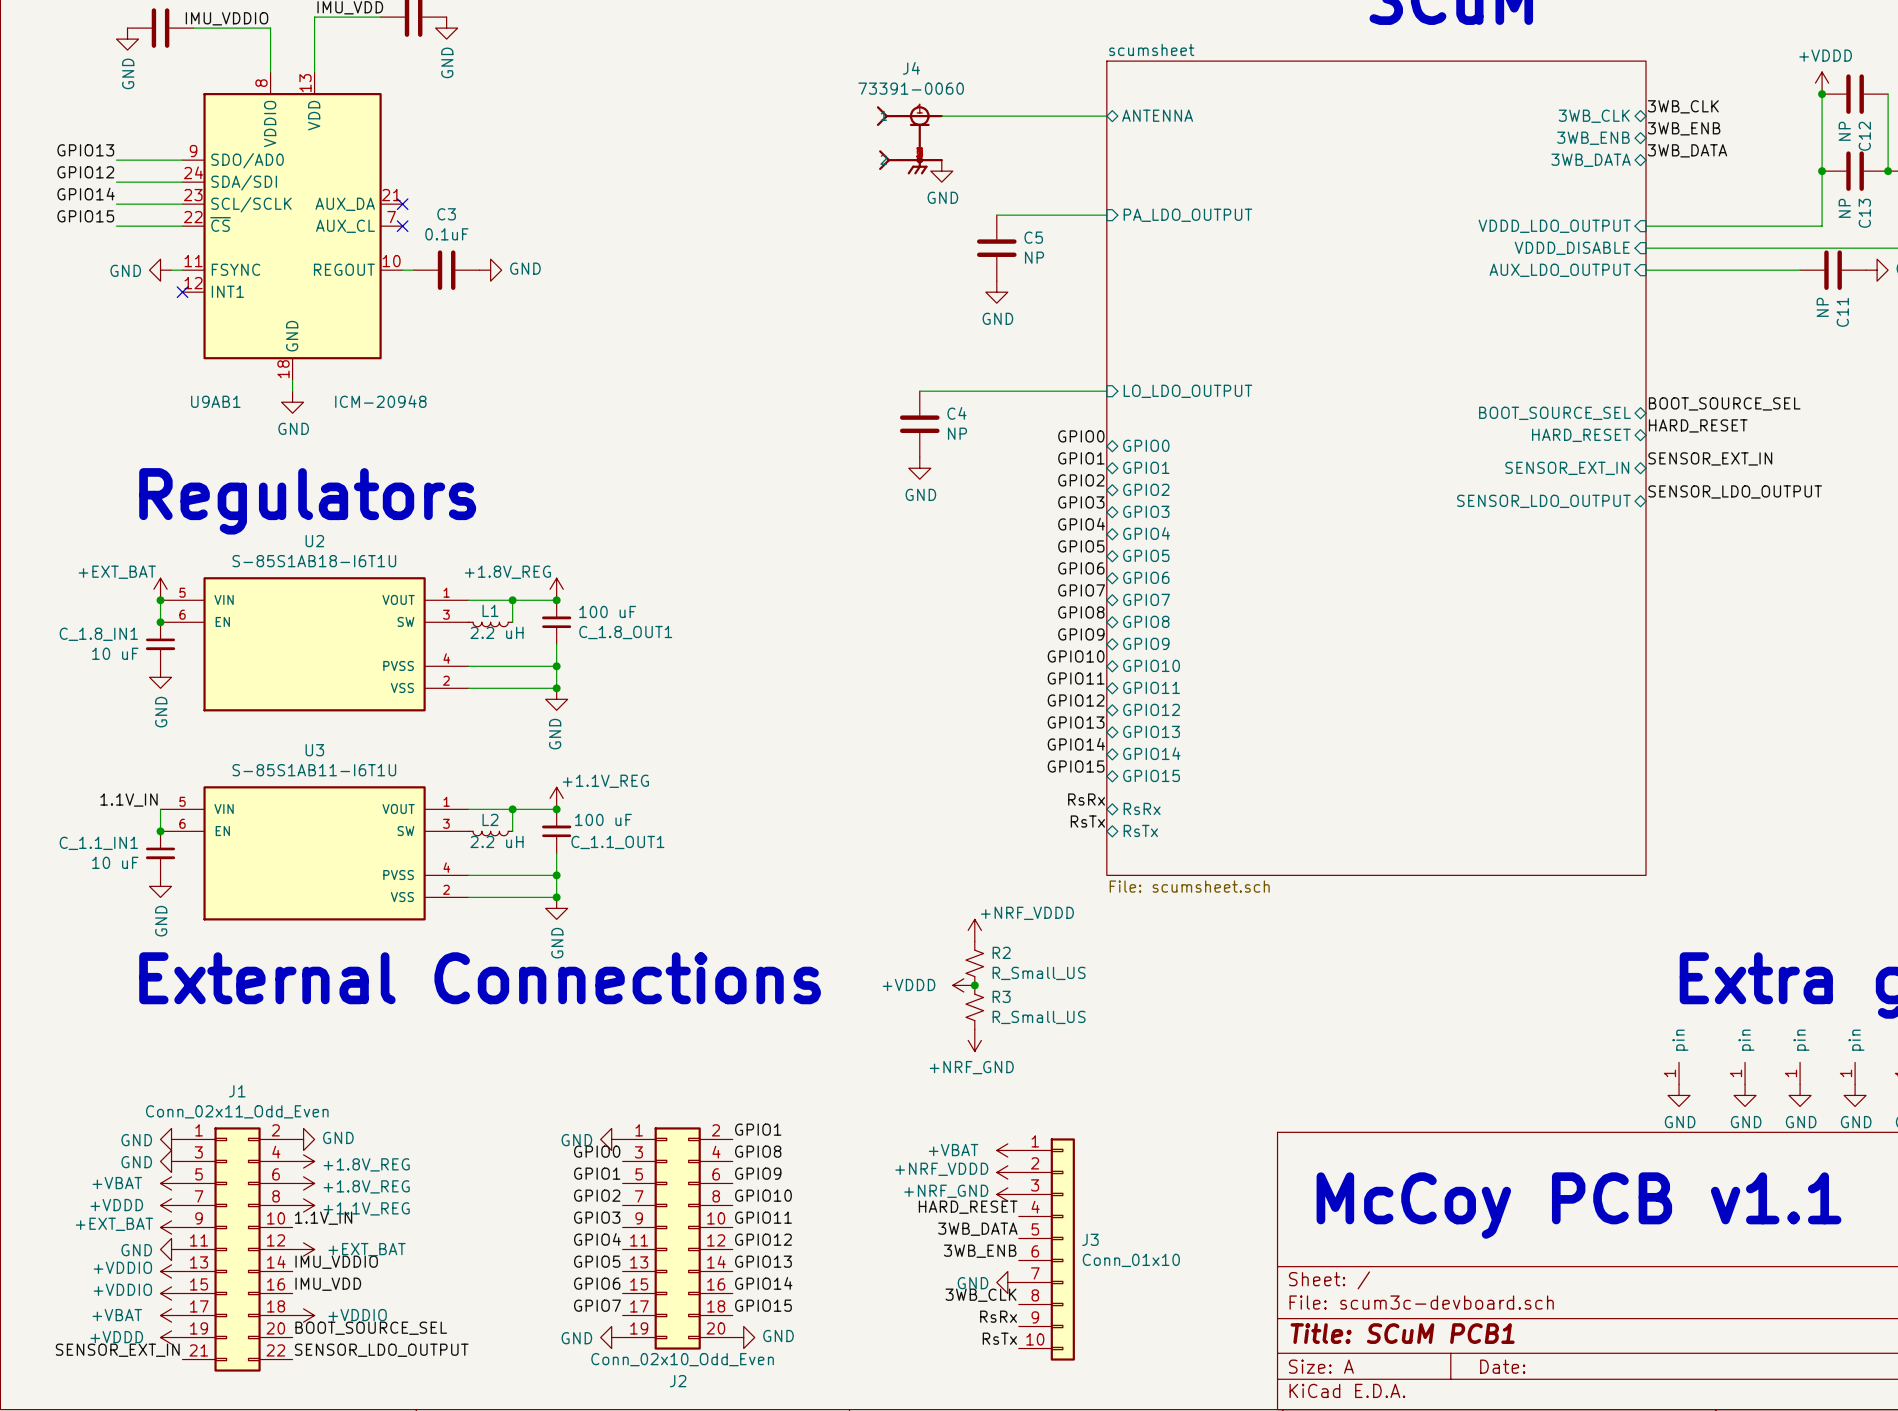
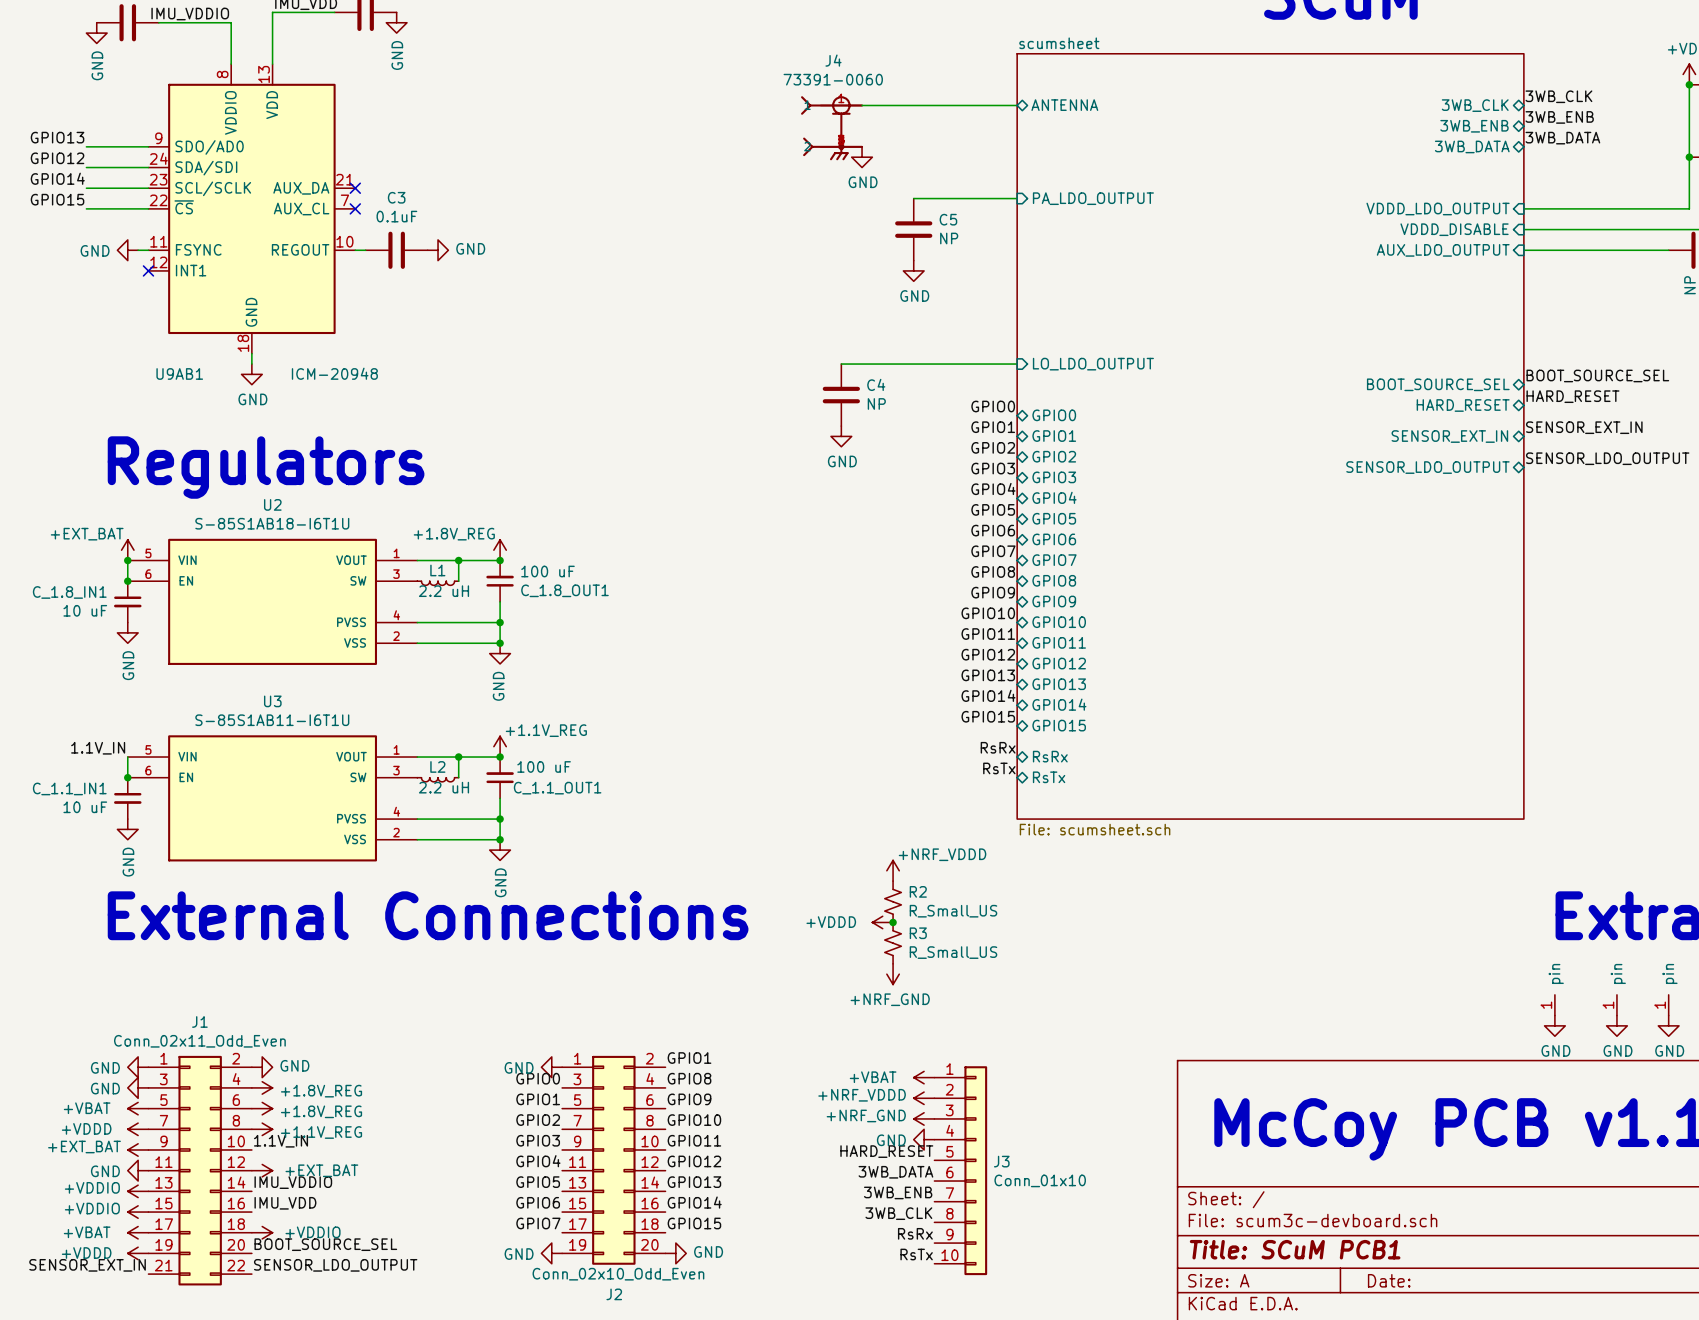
label: HARD_RESET (968, 1207) -> none
label: 3WB_DATA (977, 1229) -> HARD_RESET (886, 1151)
label: 3WB_ENB (980, 1251) -> 3WB_DATA (895, 1172)
label: none -> 3WB_ENB (898, 1192)
power symbol position: GND (1007, 1282) -> GND (924, 1139)

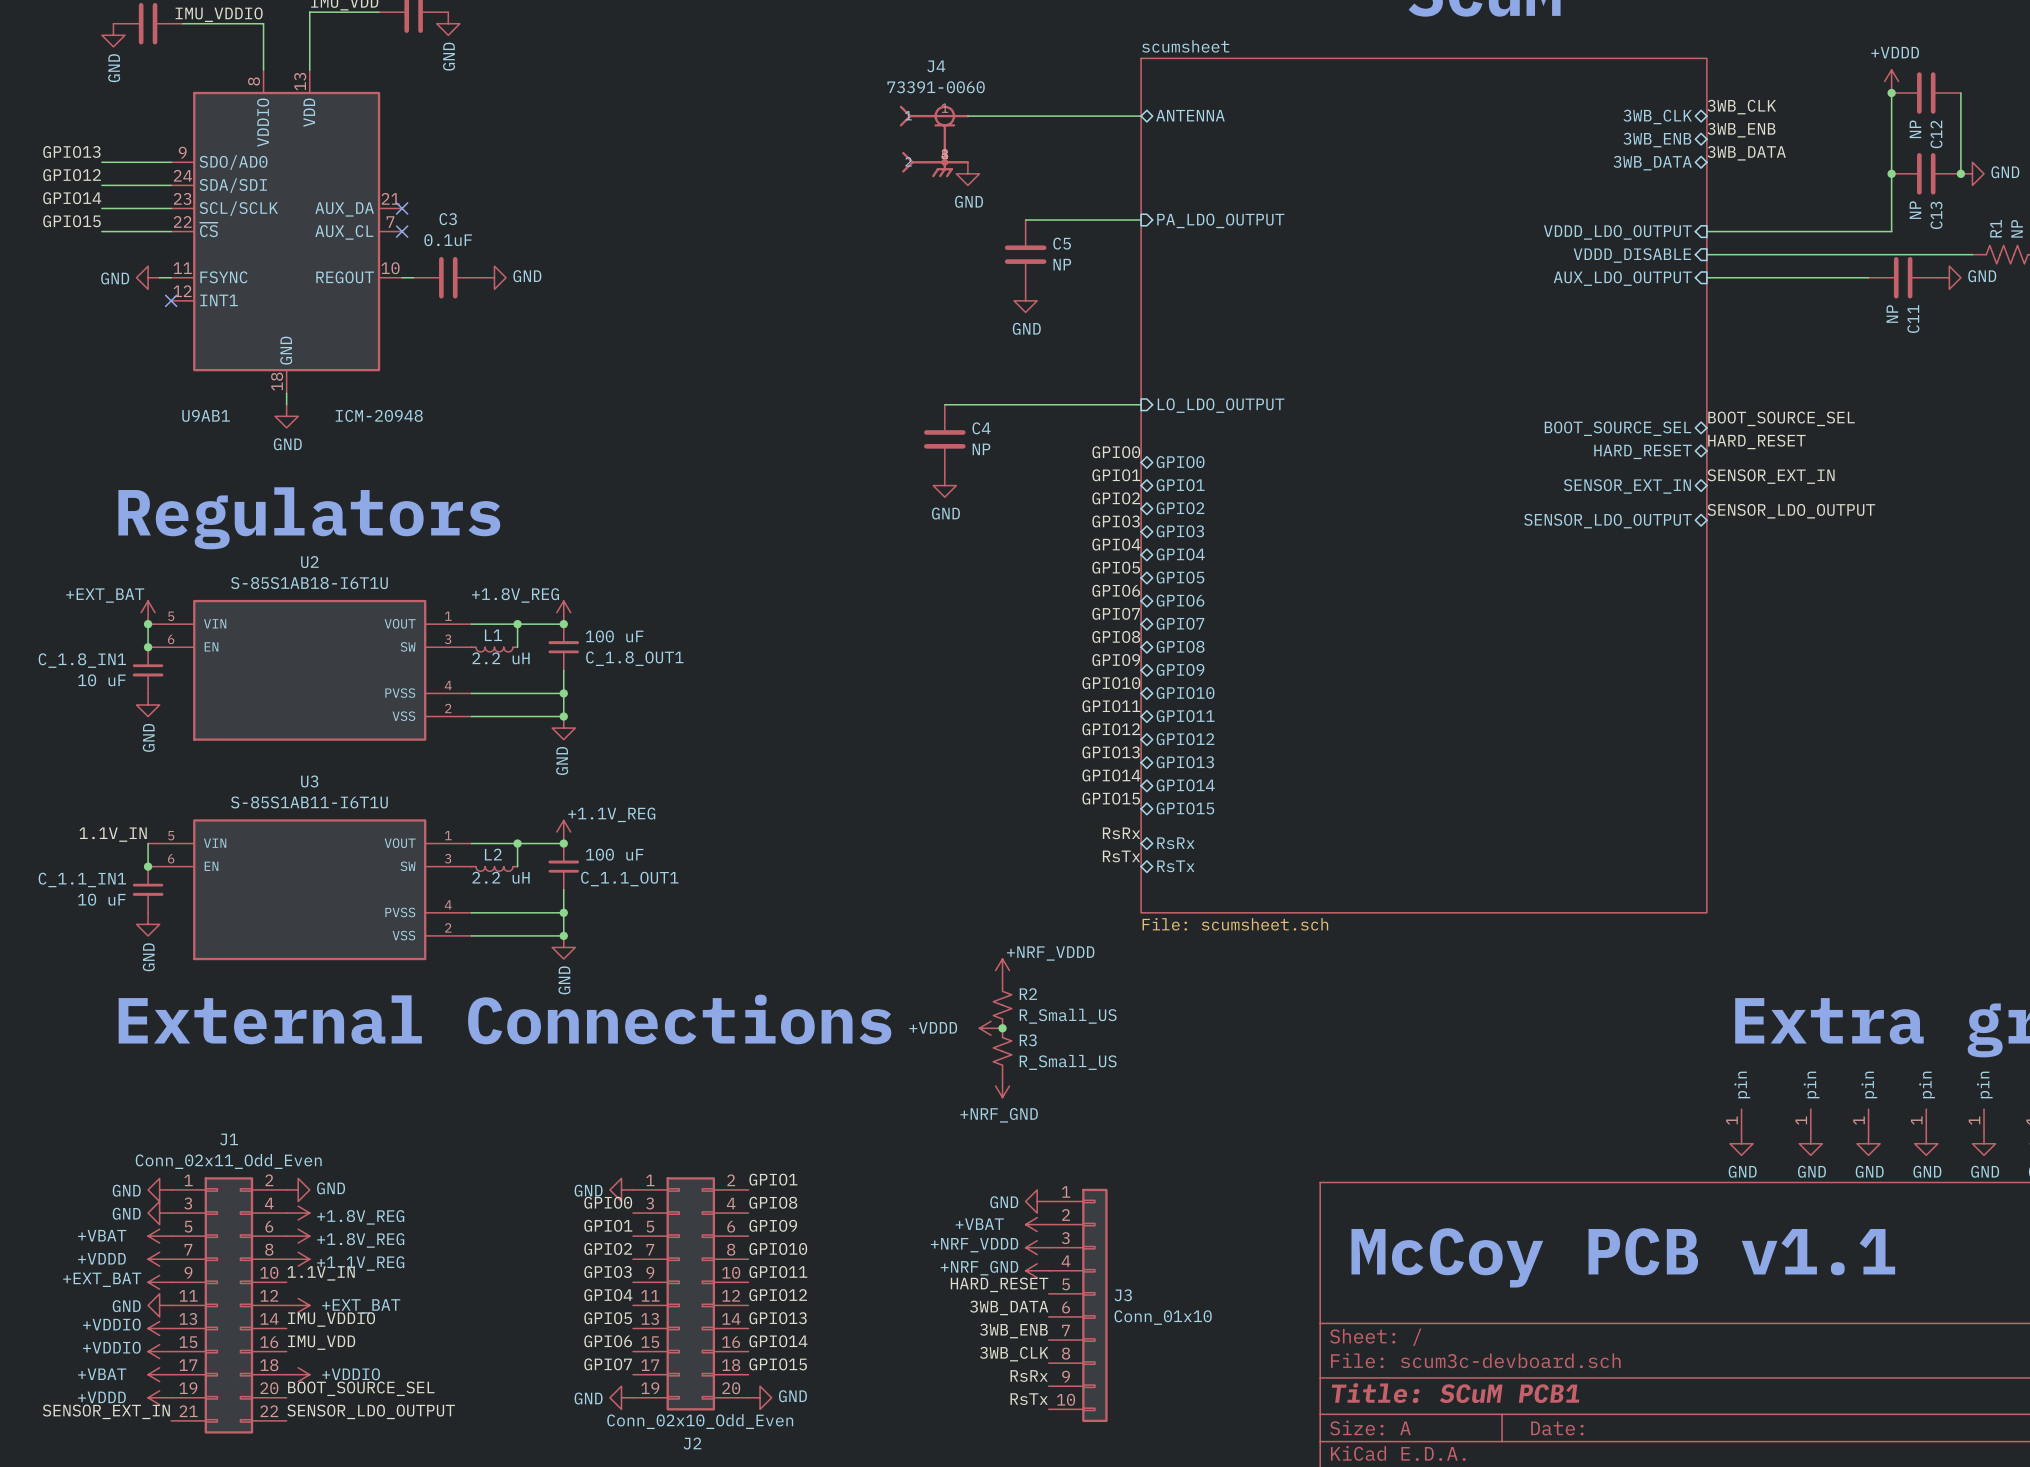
power symbol: +VBAT (924, 1077) -> GND (1037, 1201)
power symbol: +NRF_VDDD (924, 1098) -> +VBAT (1037, 1224)
power symbol: +NRF_GND (924, 1118) -> +NRF_VDDD (1037, 1247)
power symbol: GND (924, 1139) -> +NRF_GND (1037, 1270)

